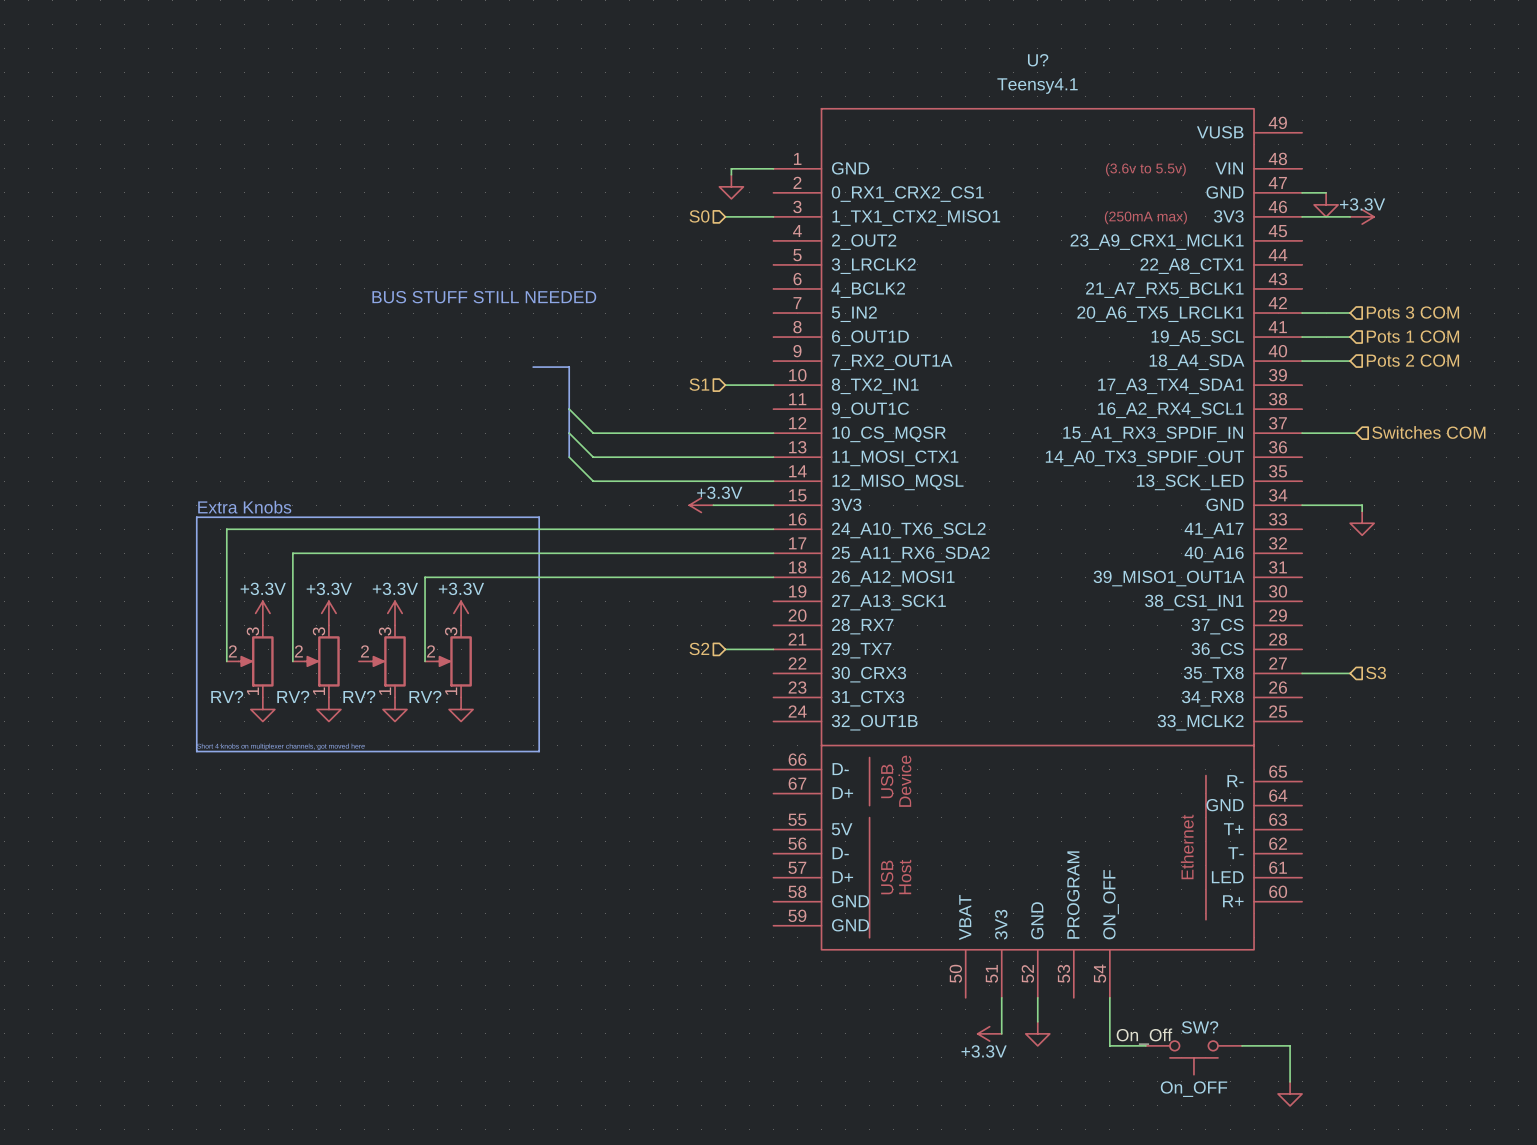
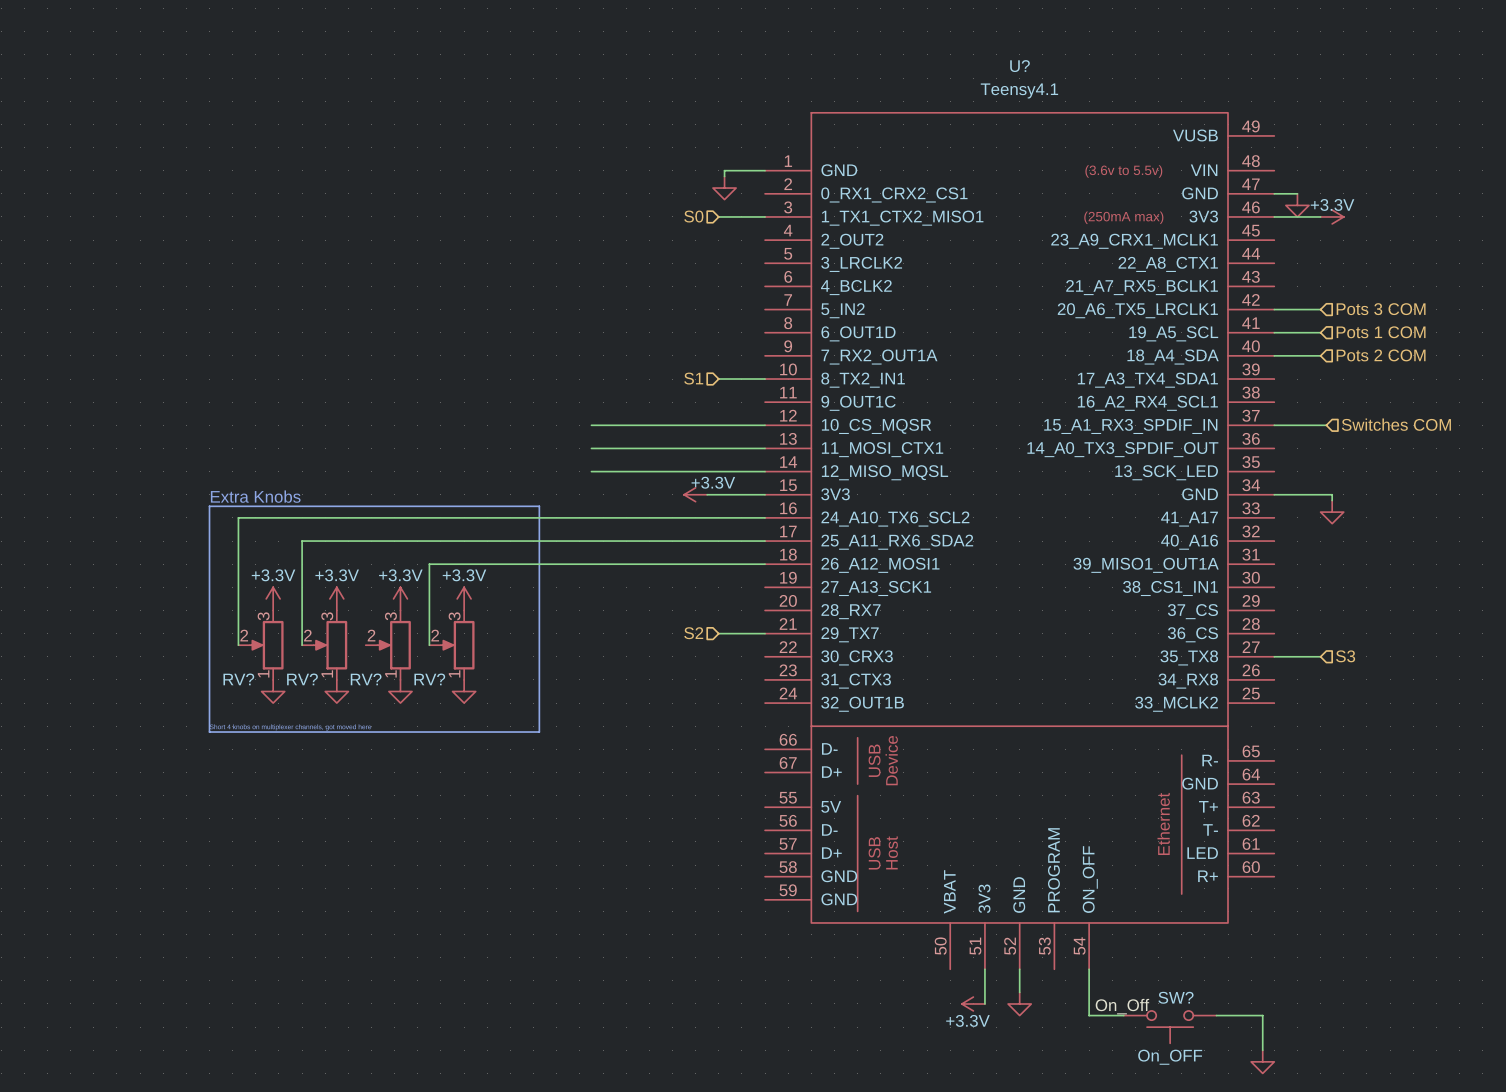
text: BUS STUFF STILL NEEDED (484, 297) -> none
bus: (533, 367) (569, 367) (569, 457) -> none
wire: (569, 409) (593, 433) -> none
wire: (569, 433) (593, 457) -> none
wire: (569, 457) (593, 481) -> none

